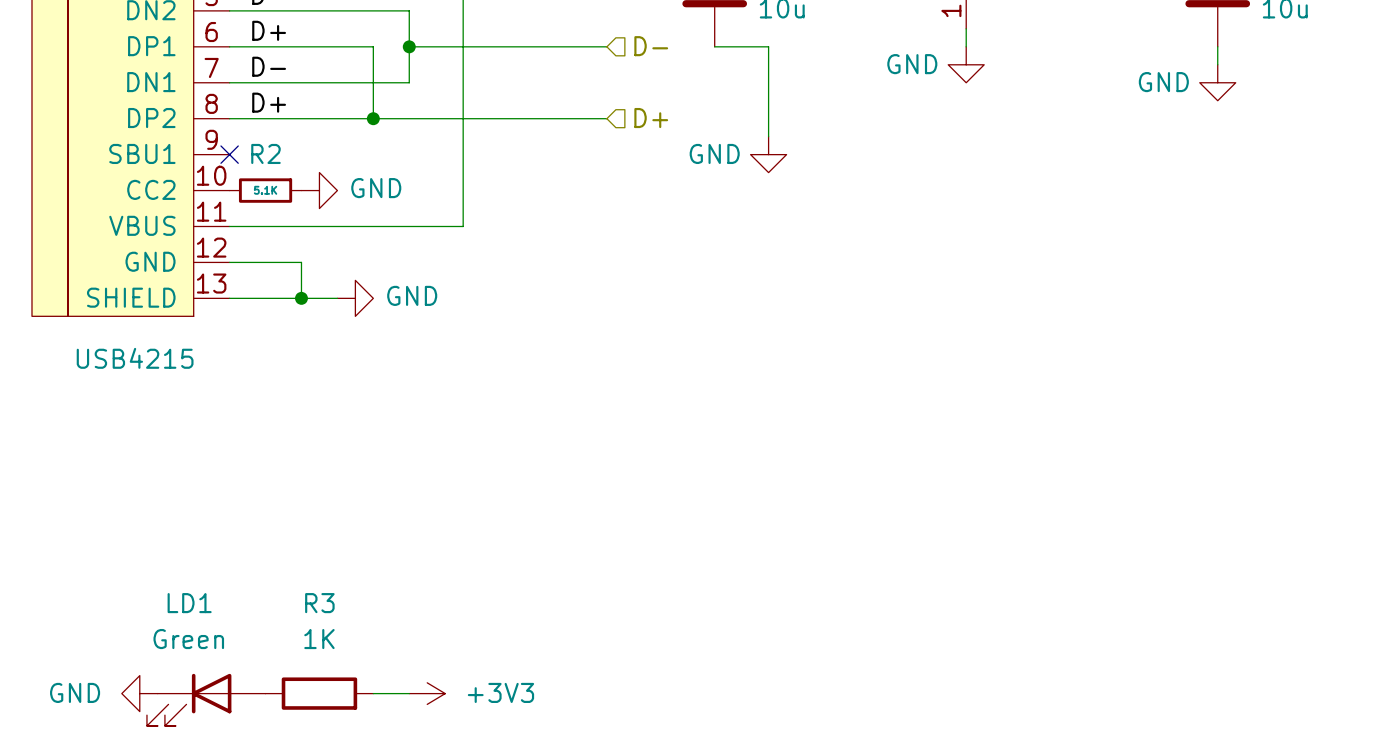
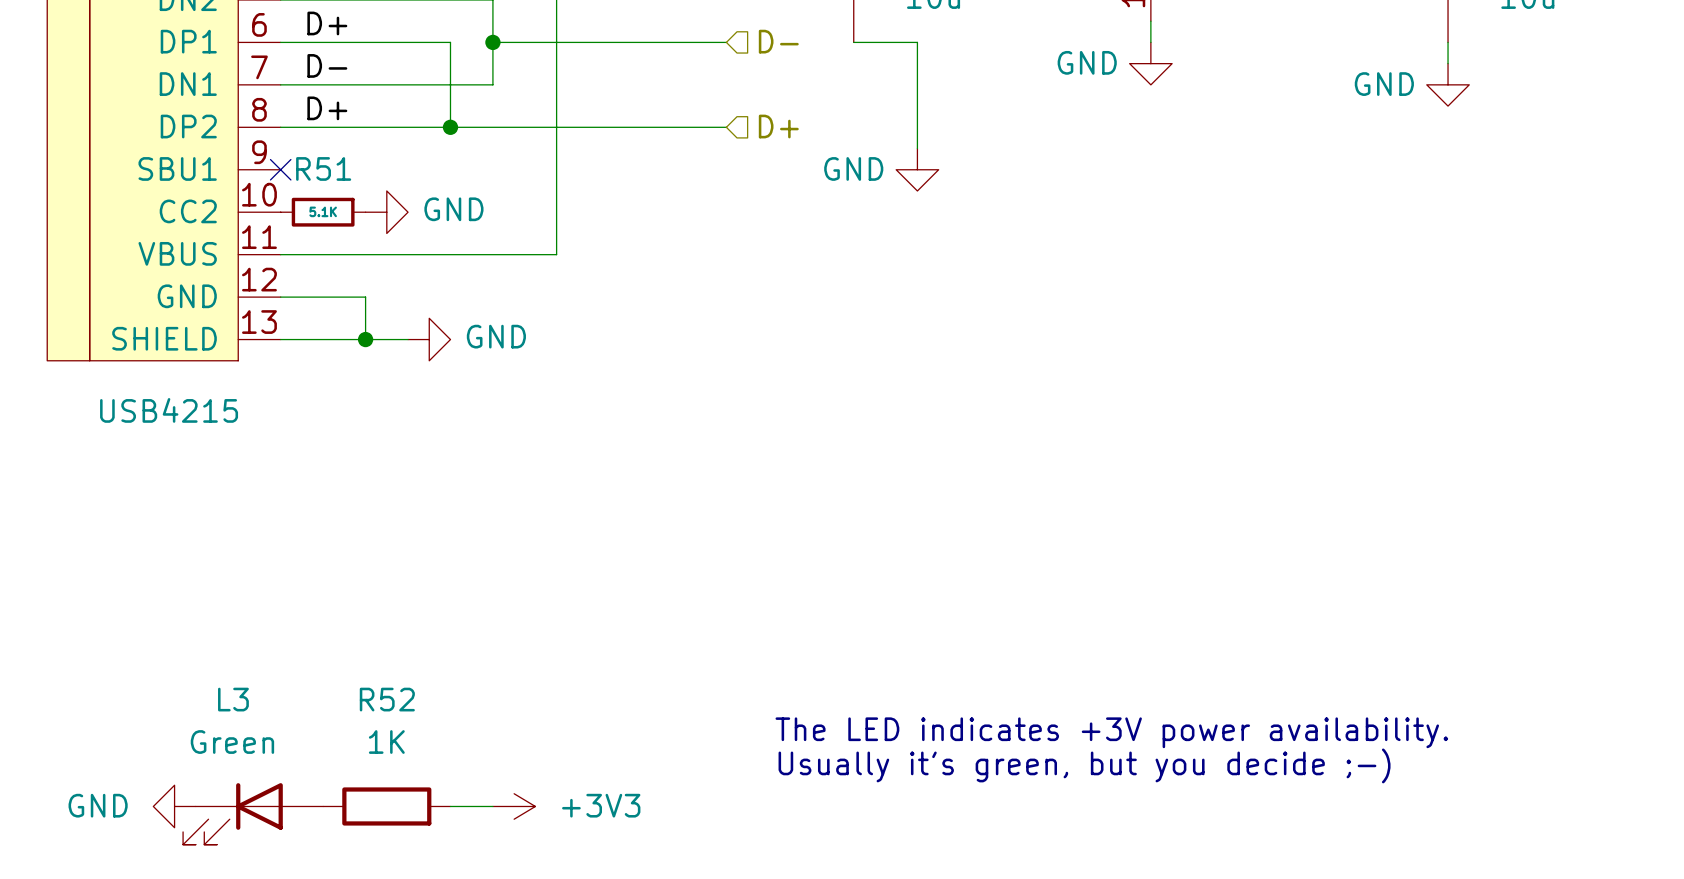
R2 name: R2 (265, 153) -> R51 (323, 168)
LD1 name: LD1 (189, 603) -> L3 (233, 699)
R3 name: R3 (319, 603) -> R52 (387, 699)
text: none -> The LED indicates +3V power availability. (1111, 732)
text: none -> Usually it's green, but you decide ;-) (1084, 765)

